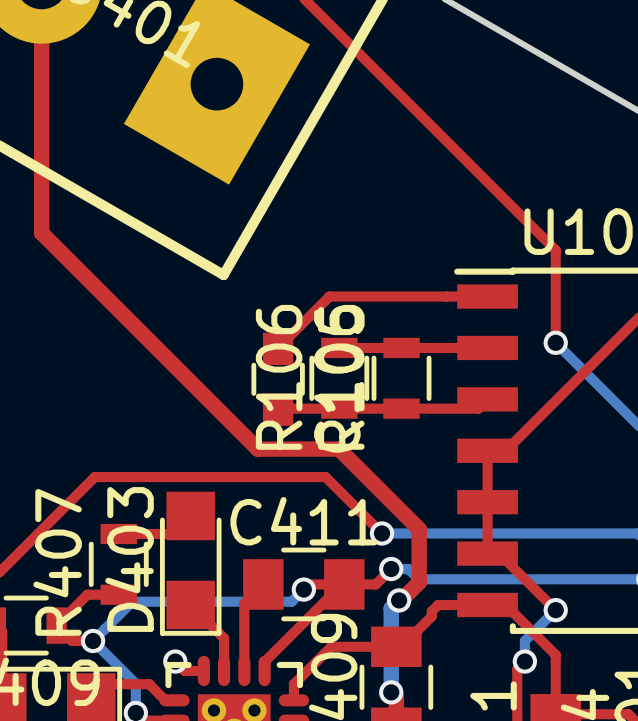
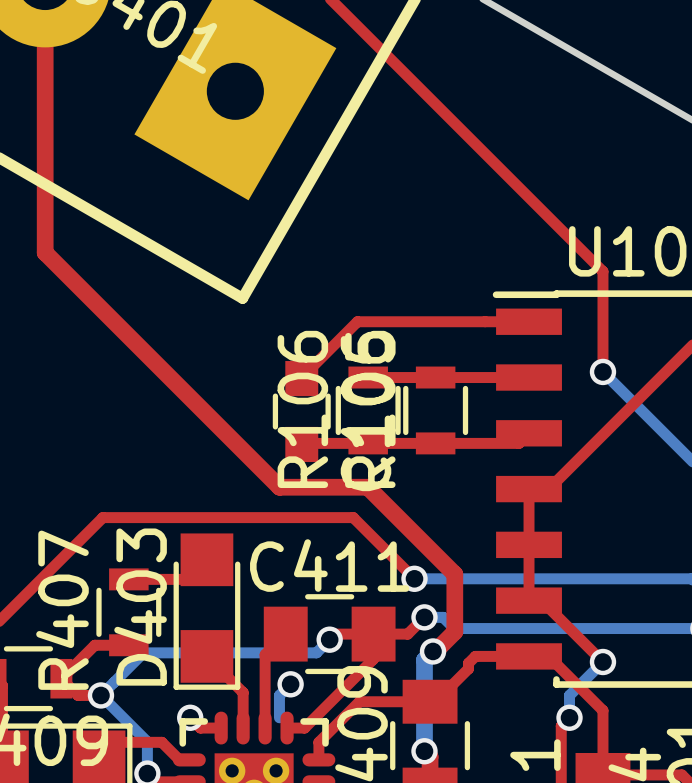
top track: (342, 584) (264, 661) (264, 671) -> (373, 634) (373, 659) (304, 728) (287, 728)
bottom track: none -> (290, 684) (279, 695) (279, 717)
via: none -> (290, 684)

